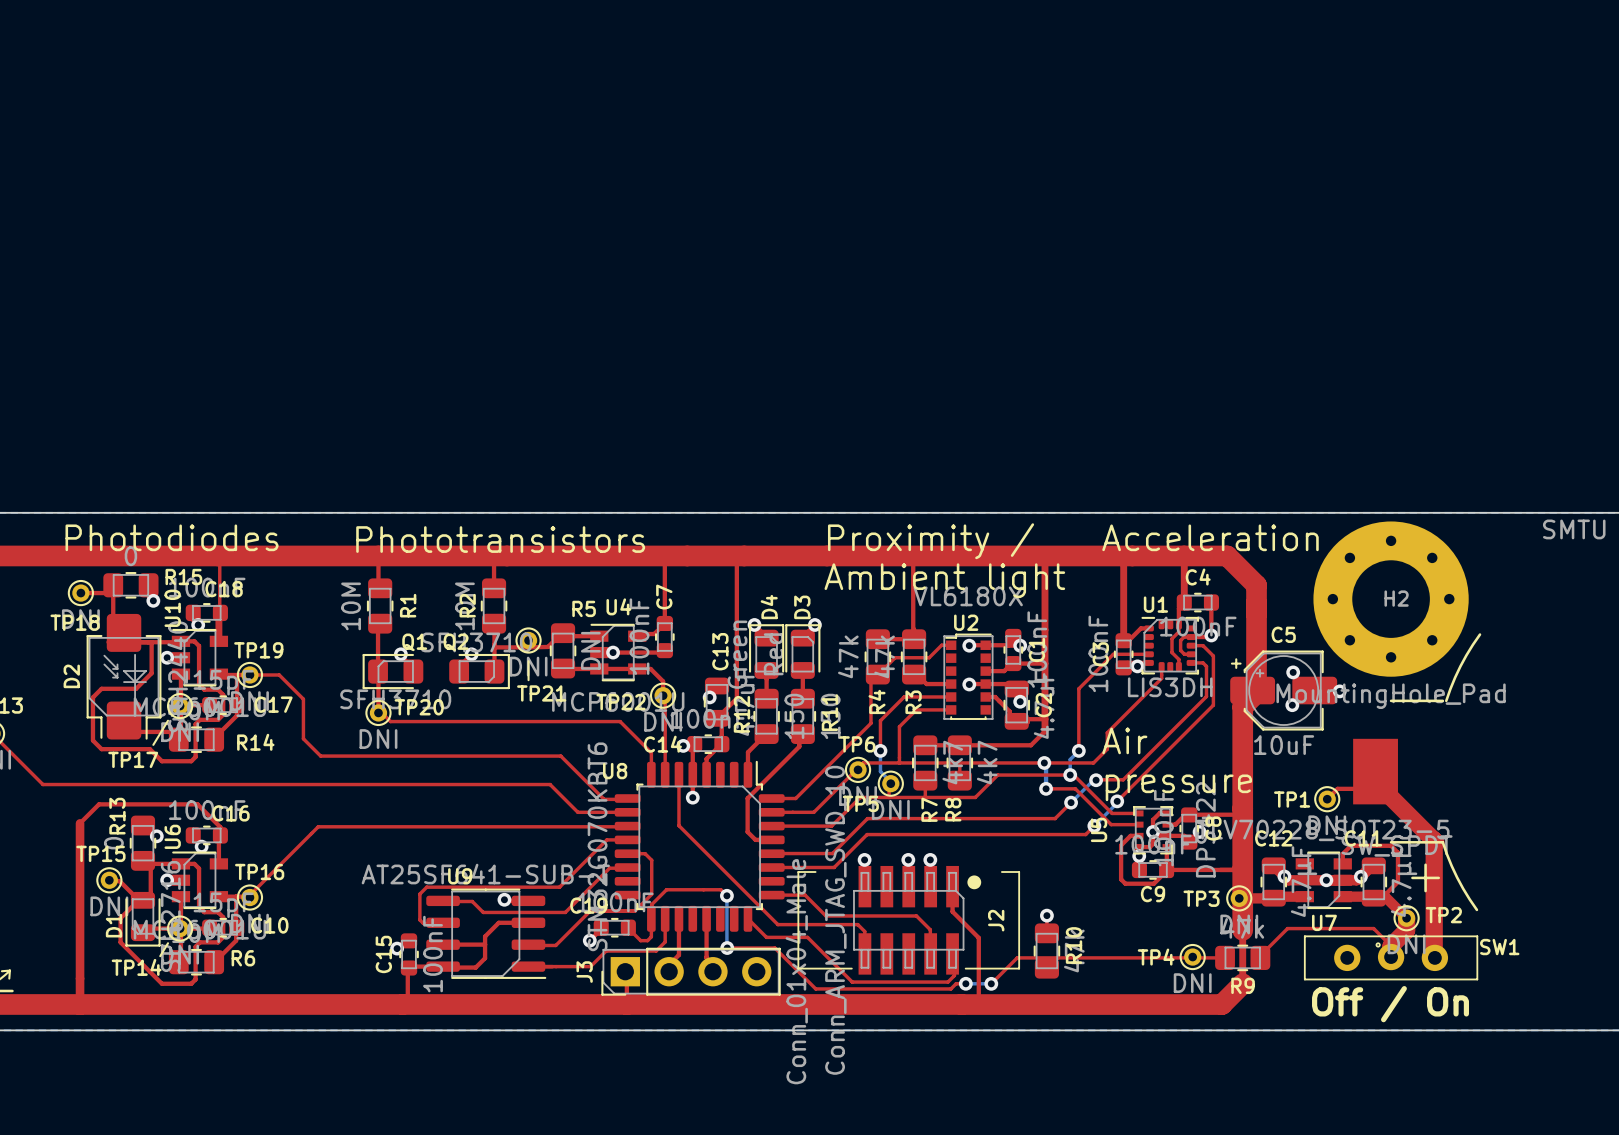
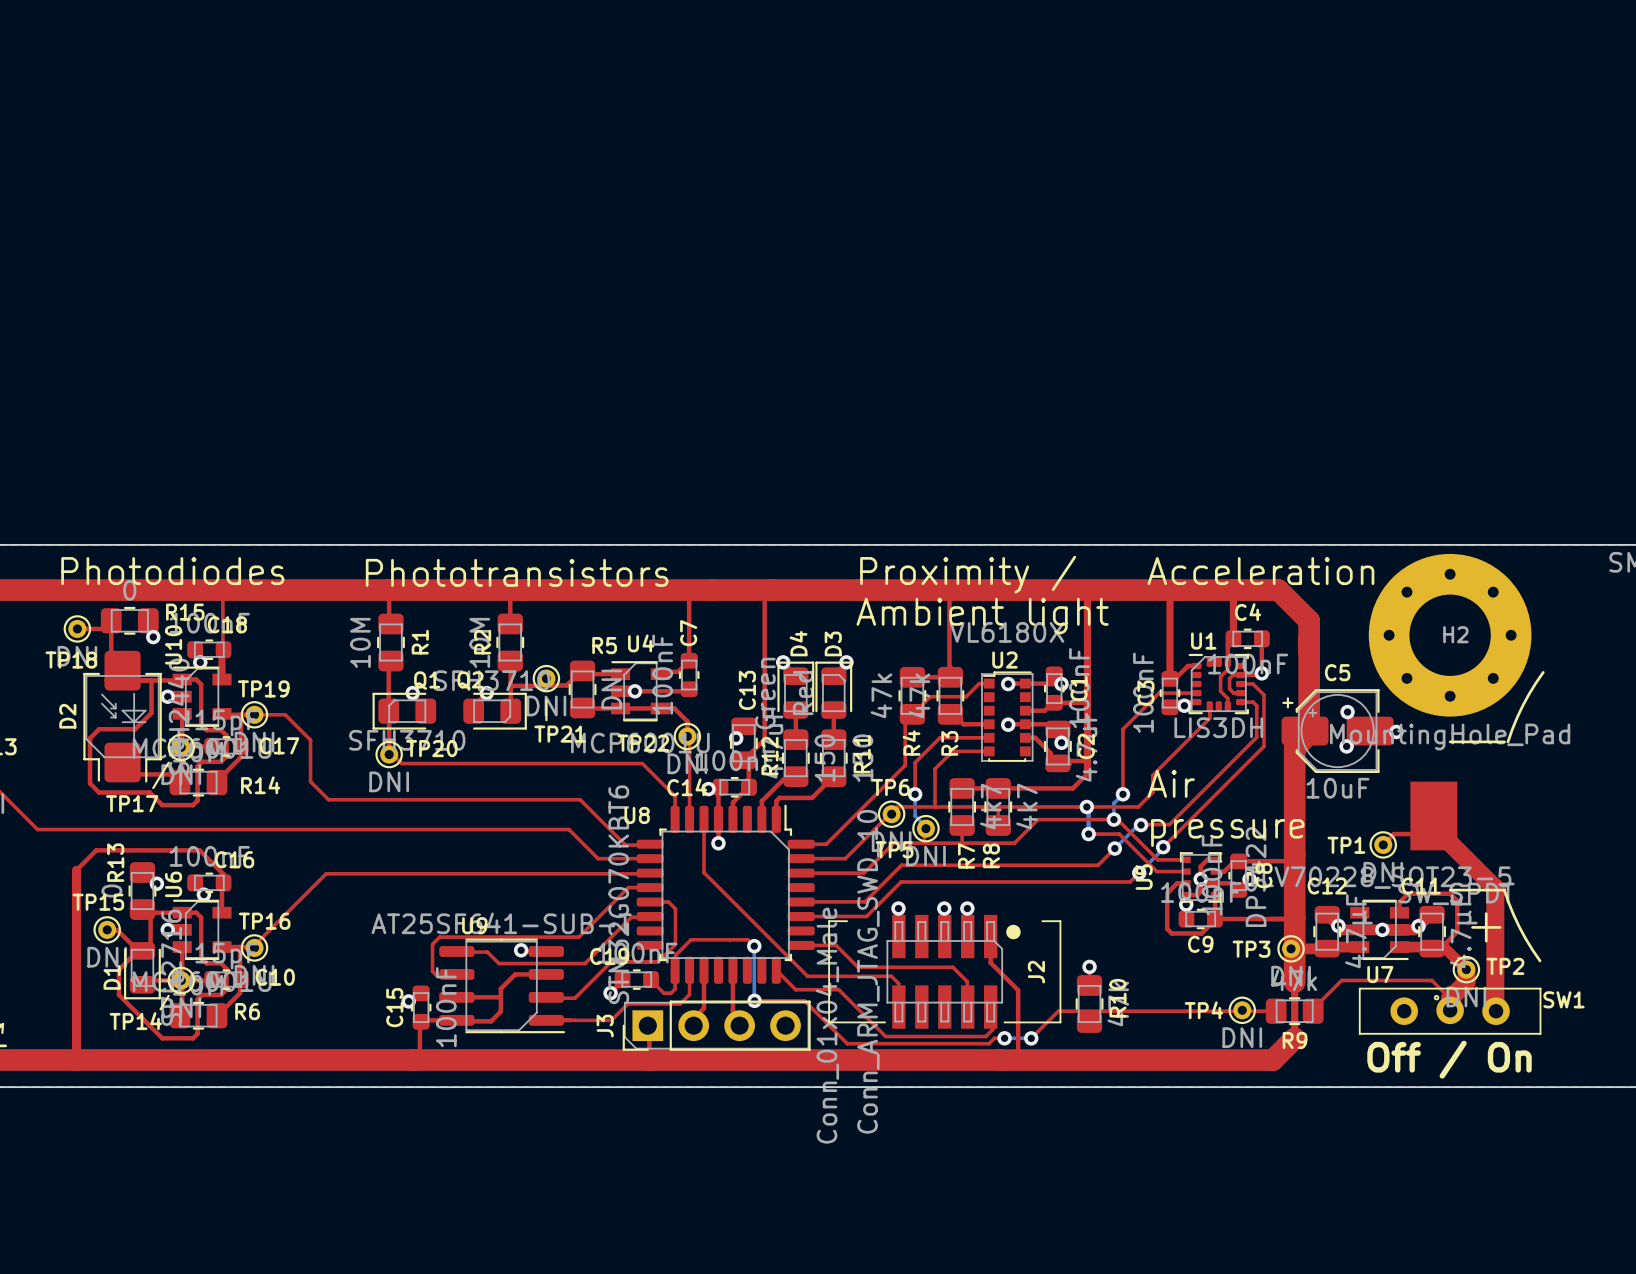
top track: none -> (795, 779) (783, 779) (761, 801) (761, 819)
top track: (765, 738) (761, 738) (747, 752) (747, 757) -> (830, 779) (812, 797) (779, 797) (776, 801)
top track: (793, 738) (799, 743) (799, 746) (747, 798) (747, 831) (755, 839) (771, 839) -> none

